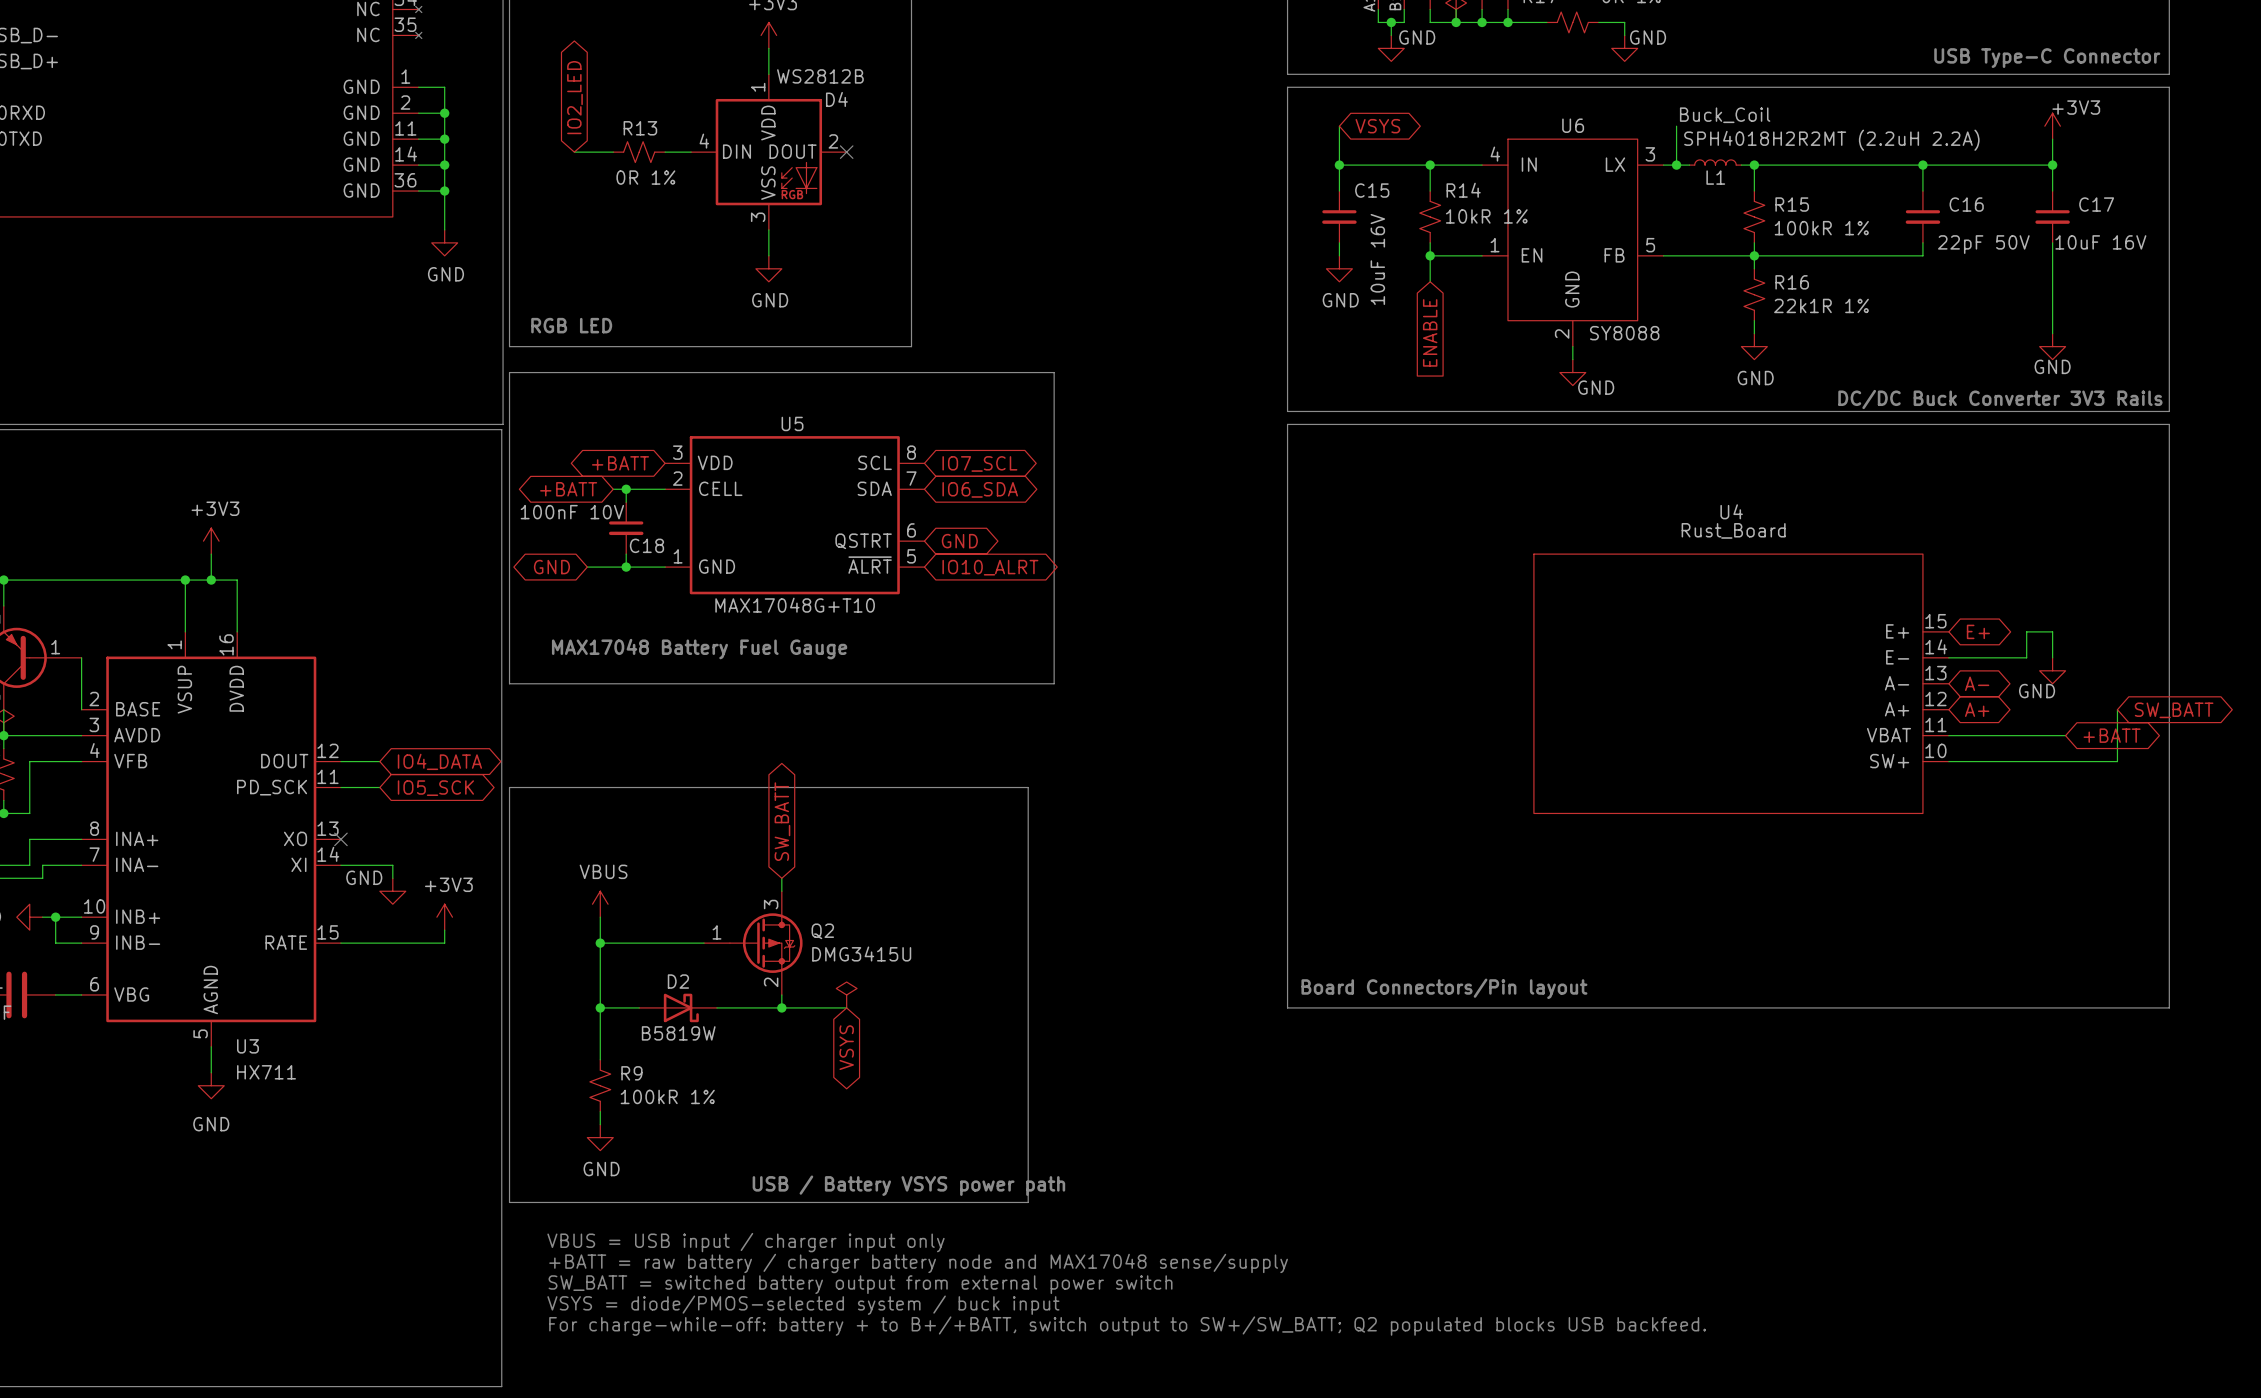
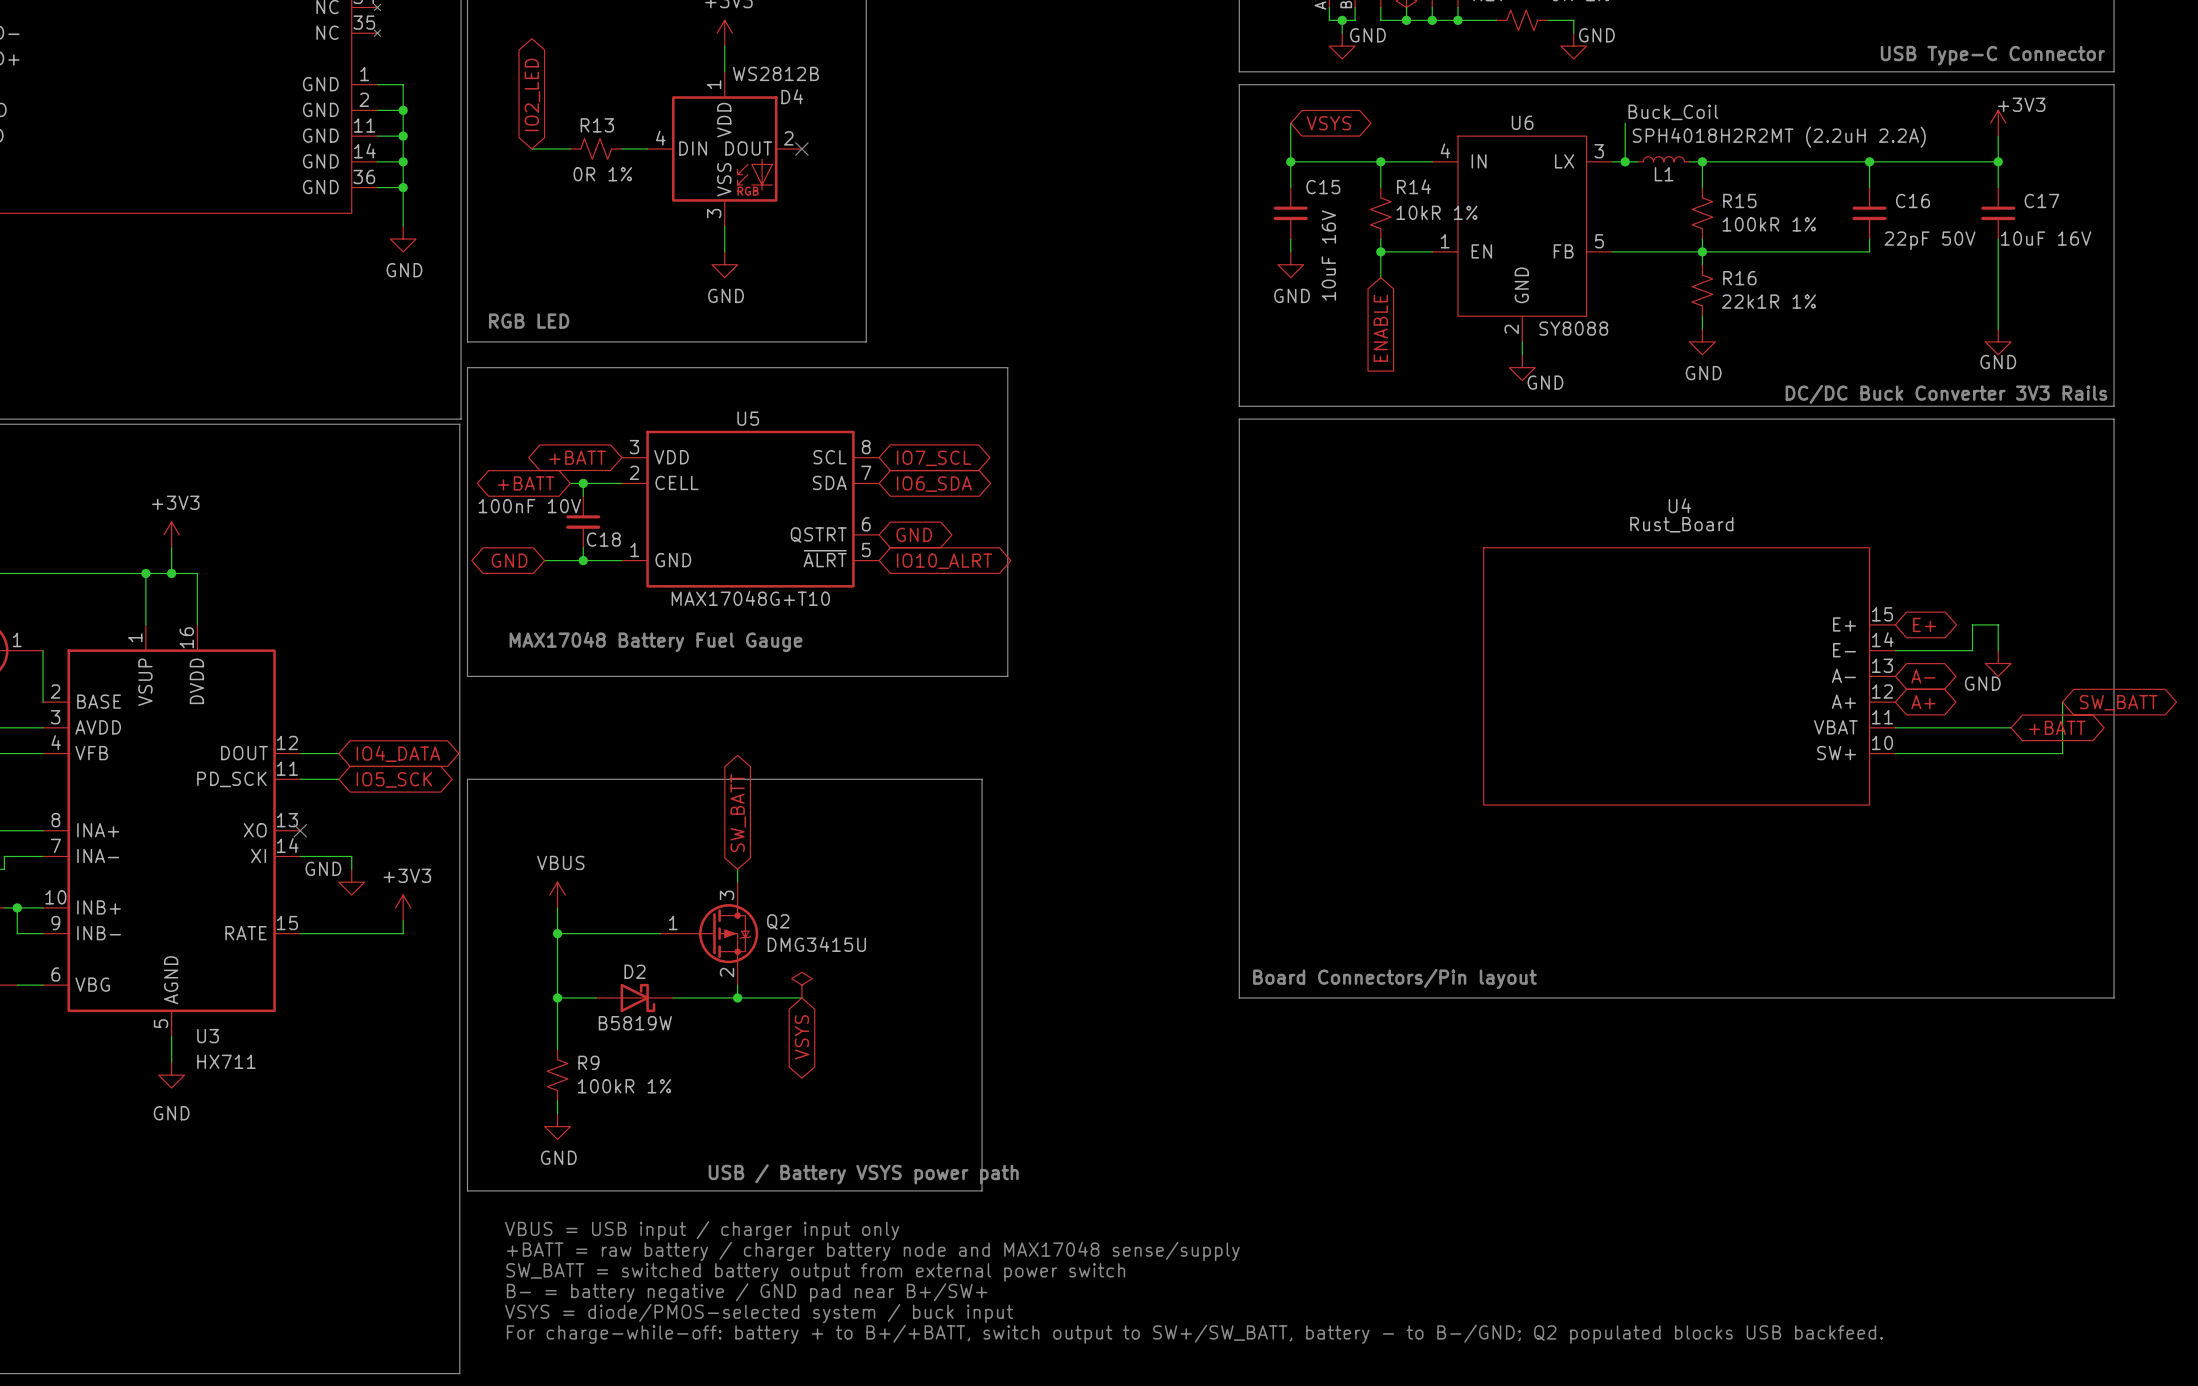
text: VSYS = diode/PMOS-selected system / buck input (803, 1305) -> B- = battery negative / GND pad near B+/SW+ (747, 1292)
text: For charge-while-off: battery + to B+/+BATT, switch output to SW+/SW_BATT; Q2 populated blocks USB backfeed. (1127, 1326) -> VSYS = diode/PMOS-selected system / buck input (759, 1313)
text: none -> For charge-while-off: battery + to B+/+BATT, switch output to SW+/SW_BATT, battery - to B-/GND; Q2 populated blocks USB backfeed. (1194, 1334)

